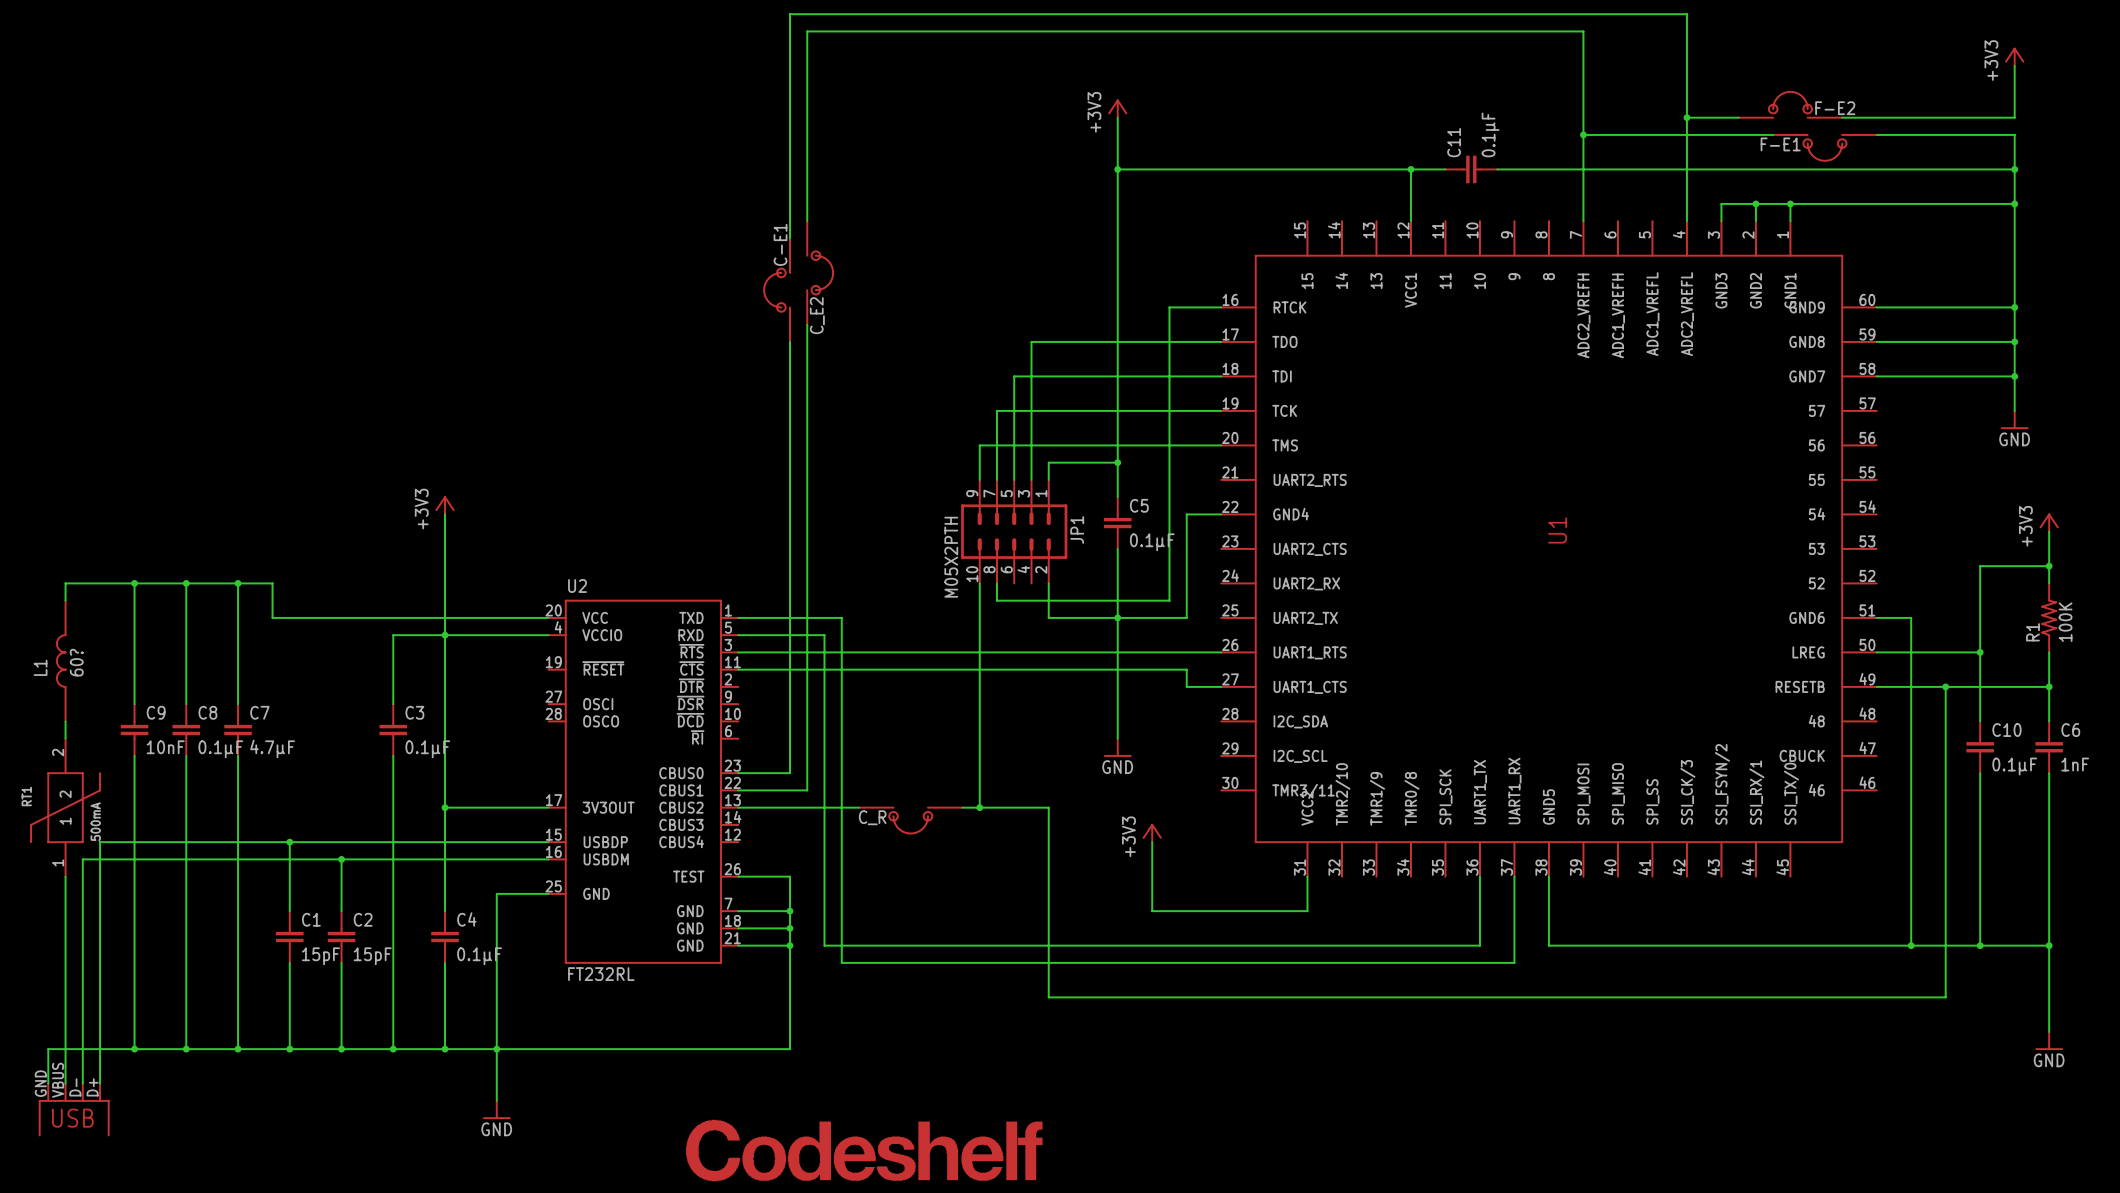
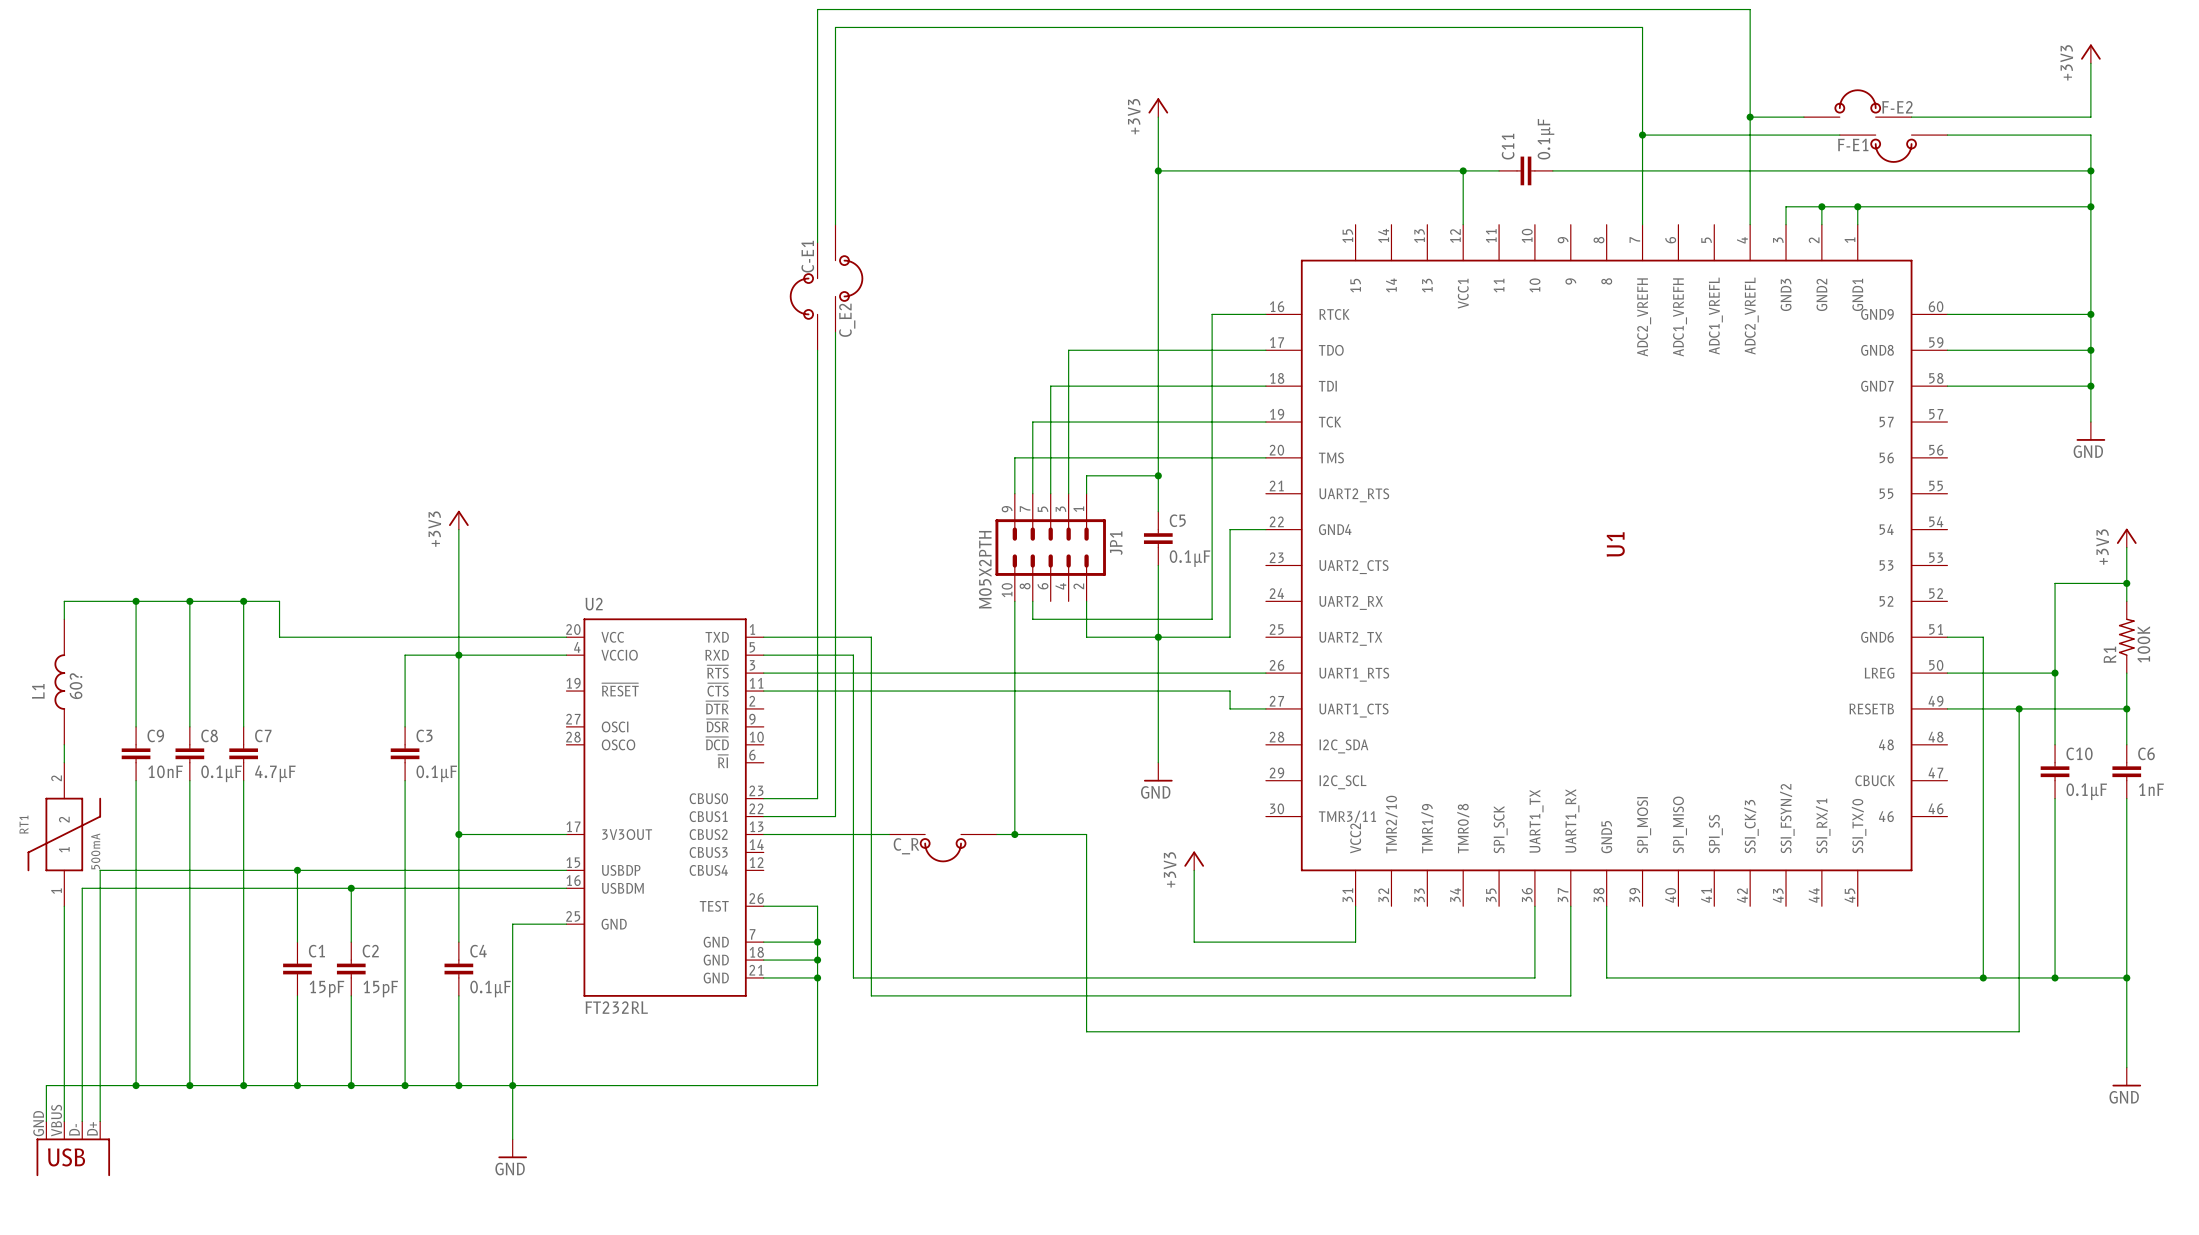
part: (864, 1150) -> none

